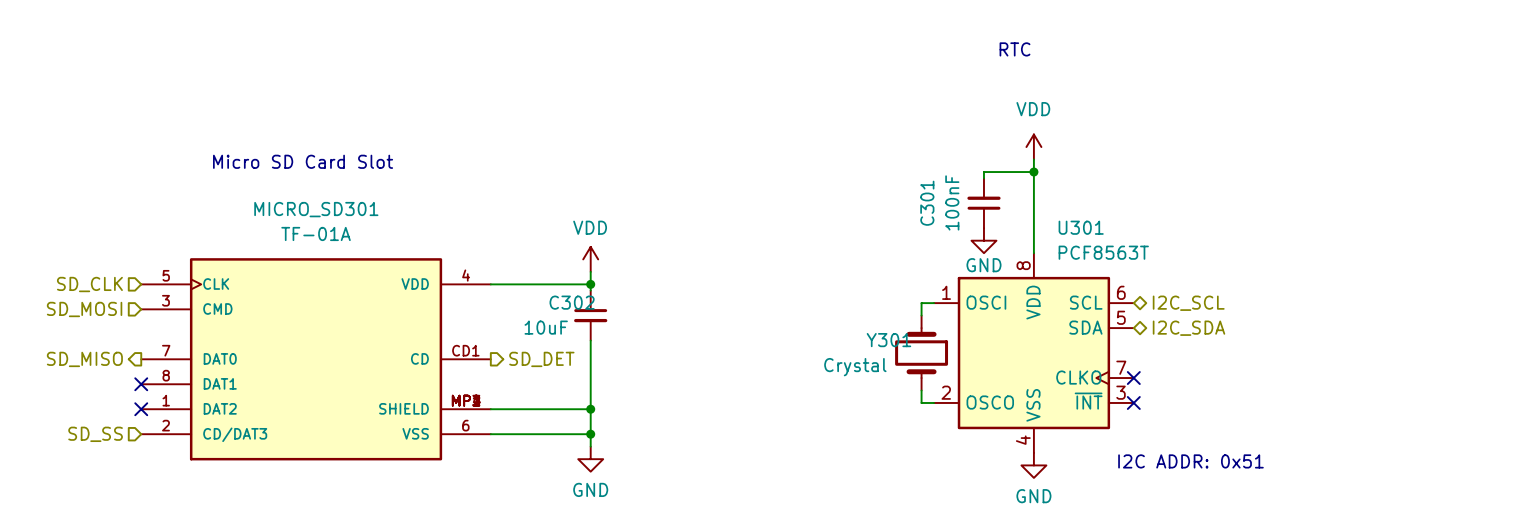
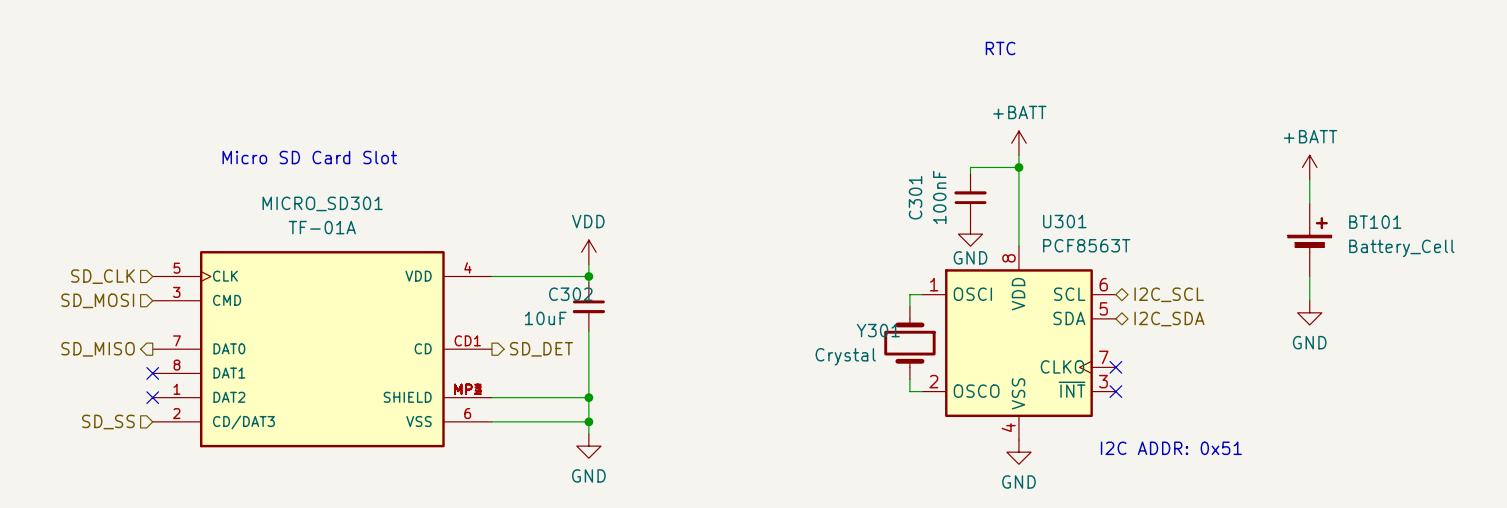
power symbol: VDD (1033, 147) -> +BATT (1018, 143)
power symbol: none -> +BATT (1309, 167)
wire: none -> (1309, 179) (1309, 203)
BT101: none -> Battery_Cell (1309, 240)
wire: none -> (1309, 276) (1309, 300)
power symbol: none -> GND (1309, 312)

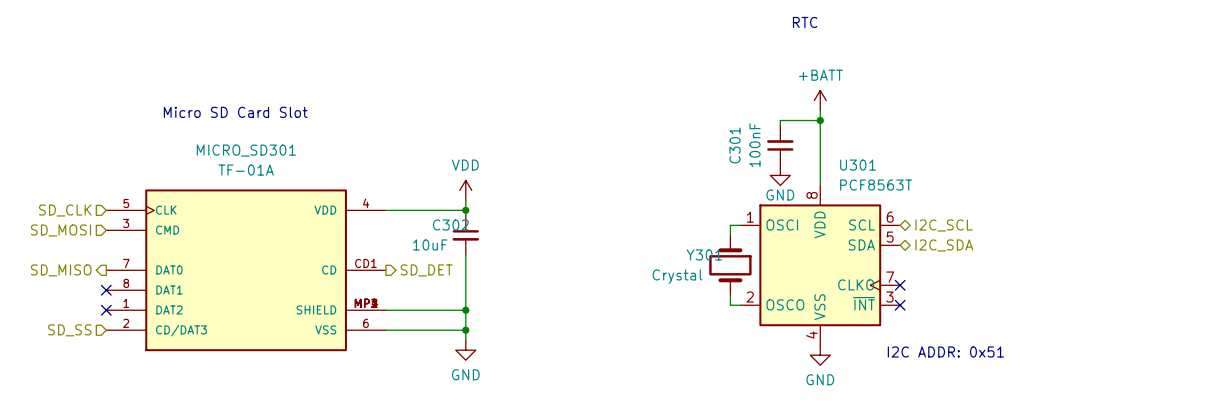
power symbol: +BATT (1309, 167) -> none
wire: (1309, 179) (1309, 203) -> none
BT101: Battery_Cell (1309, 240) -> none
wire: (1309, 276) (1309, 300) -> none
power symbol: GND (1309, 312) -> none

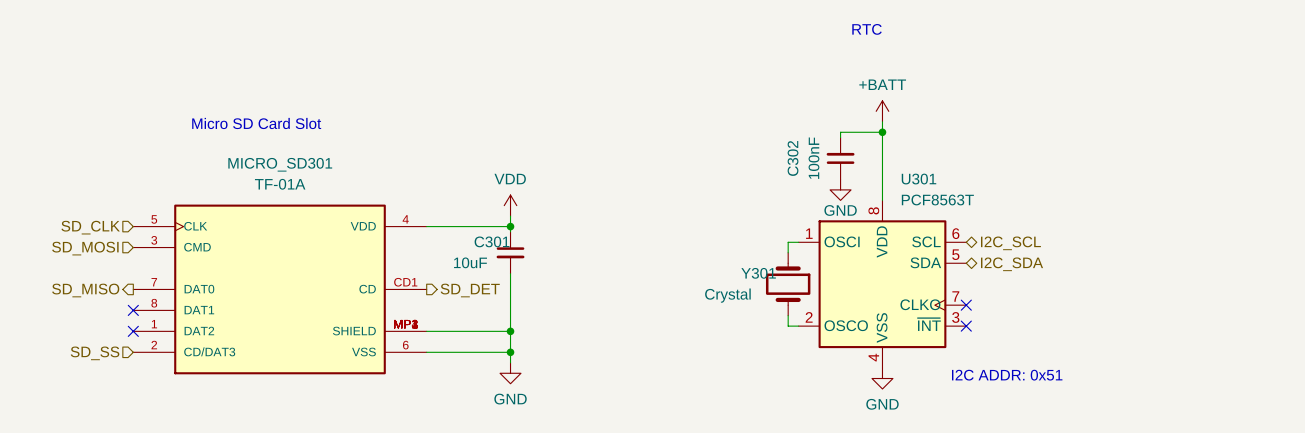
C301 name: C301 (735, 145) -> C302 (793, 158)
C302 name: C302 (450, 224) -> C301 (492, 241)

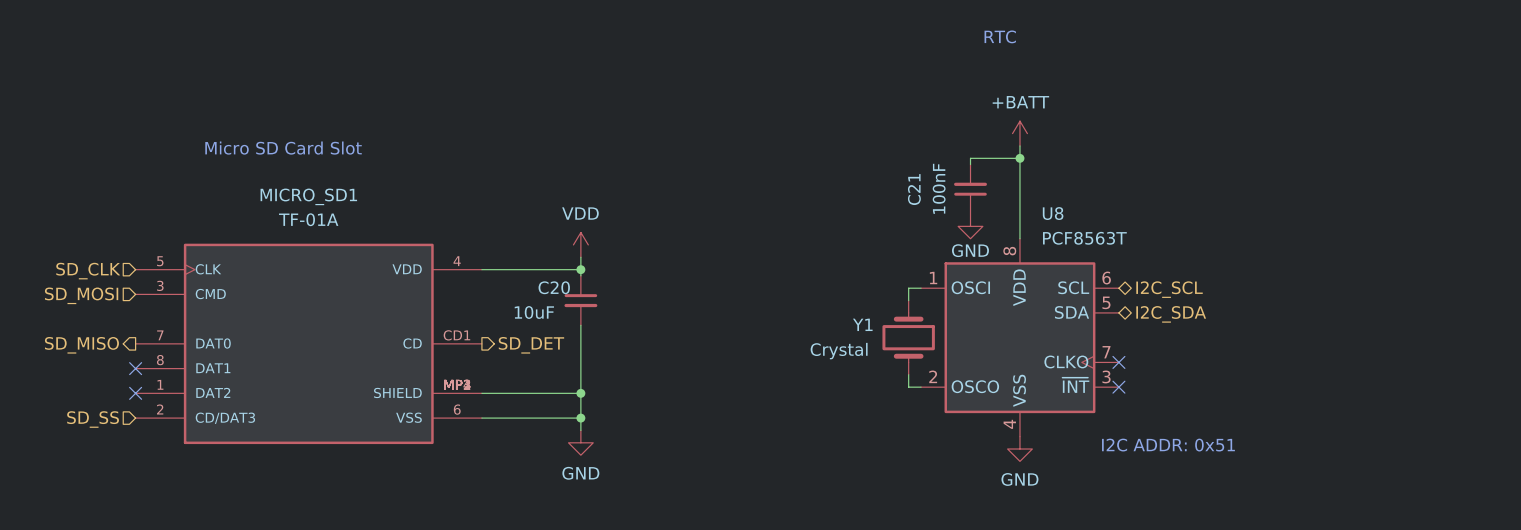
C302 name: C302 (793, 158) -> C21 (914, 189)
MICRO_SD301 name: MICRO_SD301 (280, 164) -> MICRO_SD1 (308, 196)
U301 name: U301 (919, 179) -> U8 (1053, 213)
C301 name: C301 (492, 241) -> C20 (554, 287)
Y301 name: Y301 (758, 273) -> Y1 (862, 324)

